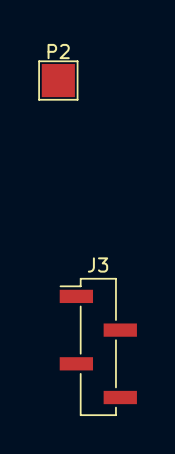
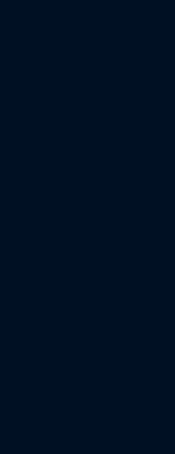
P2: (58, 80) -> none
J3: (98, 346) -> none

